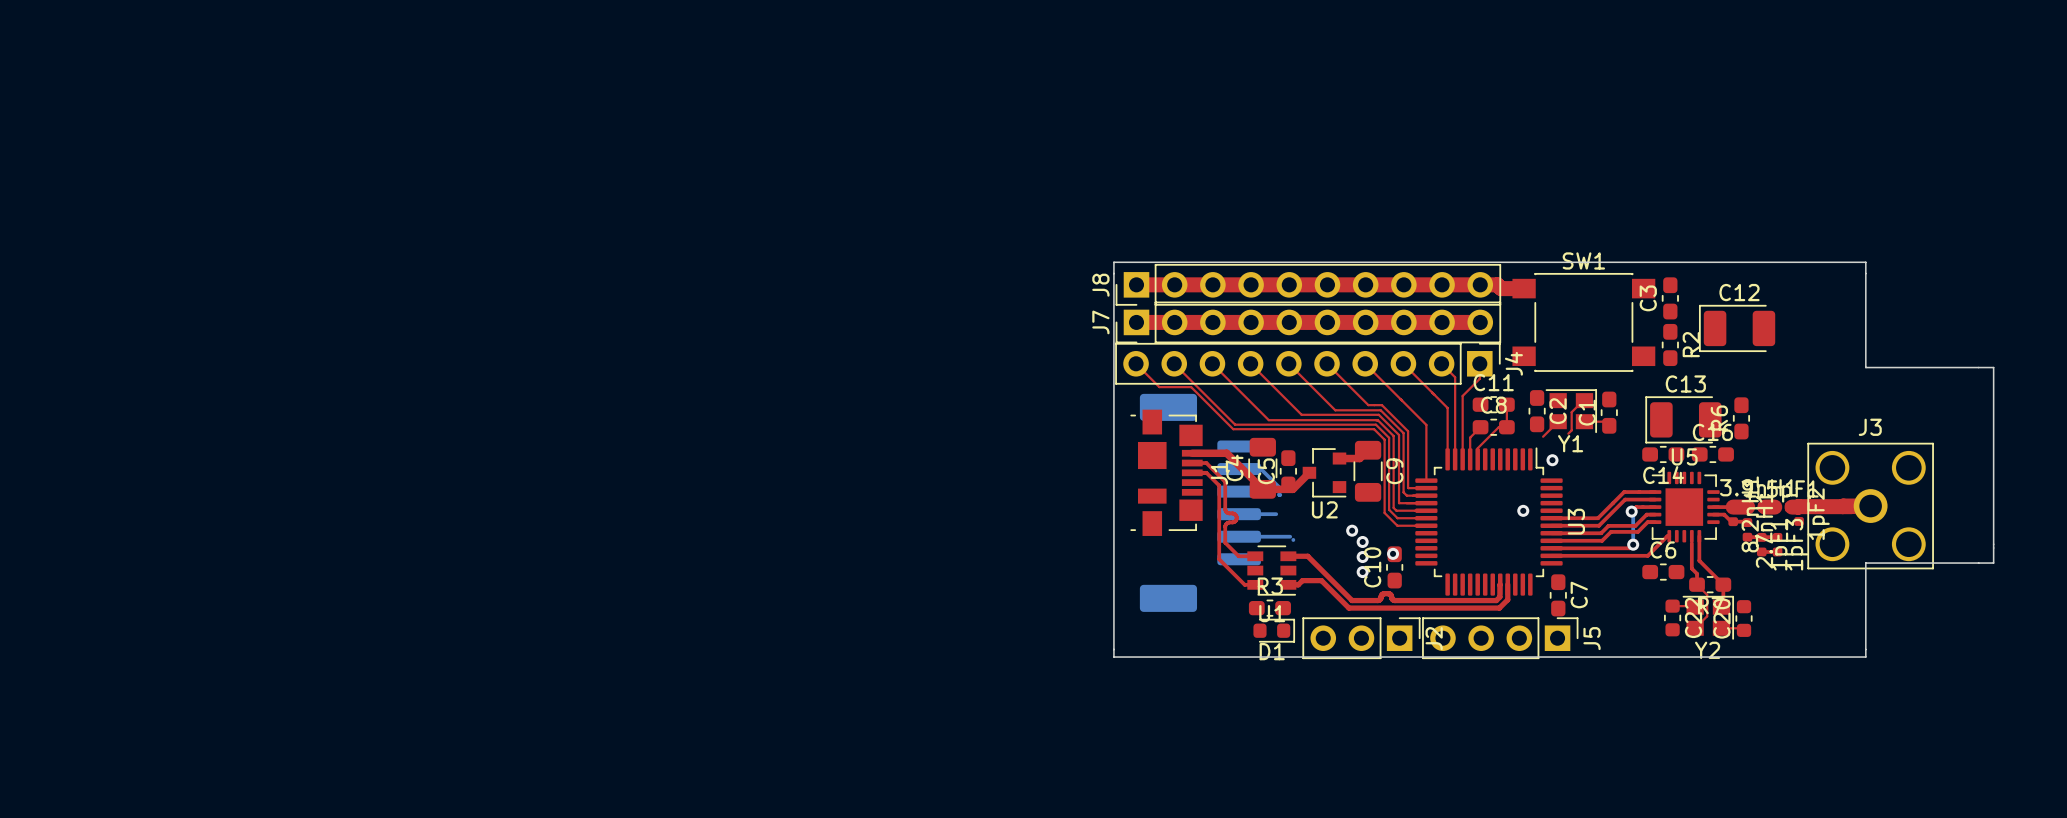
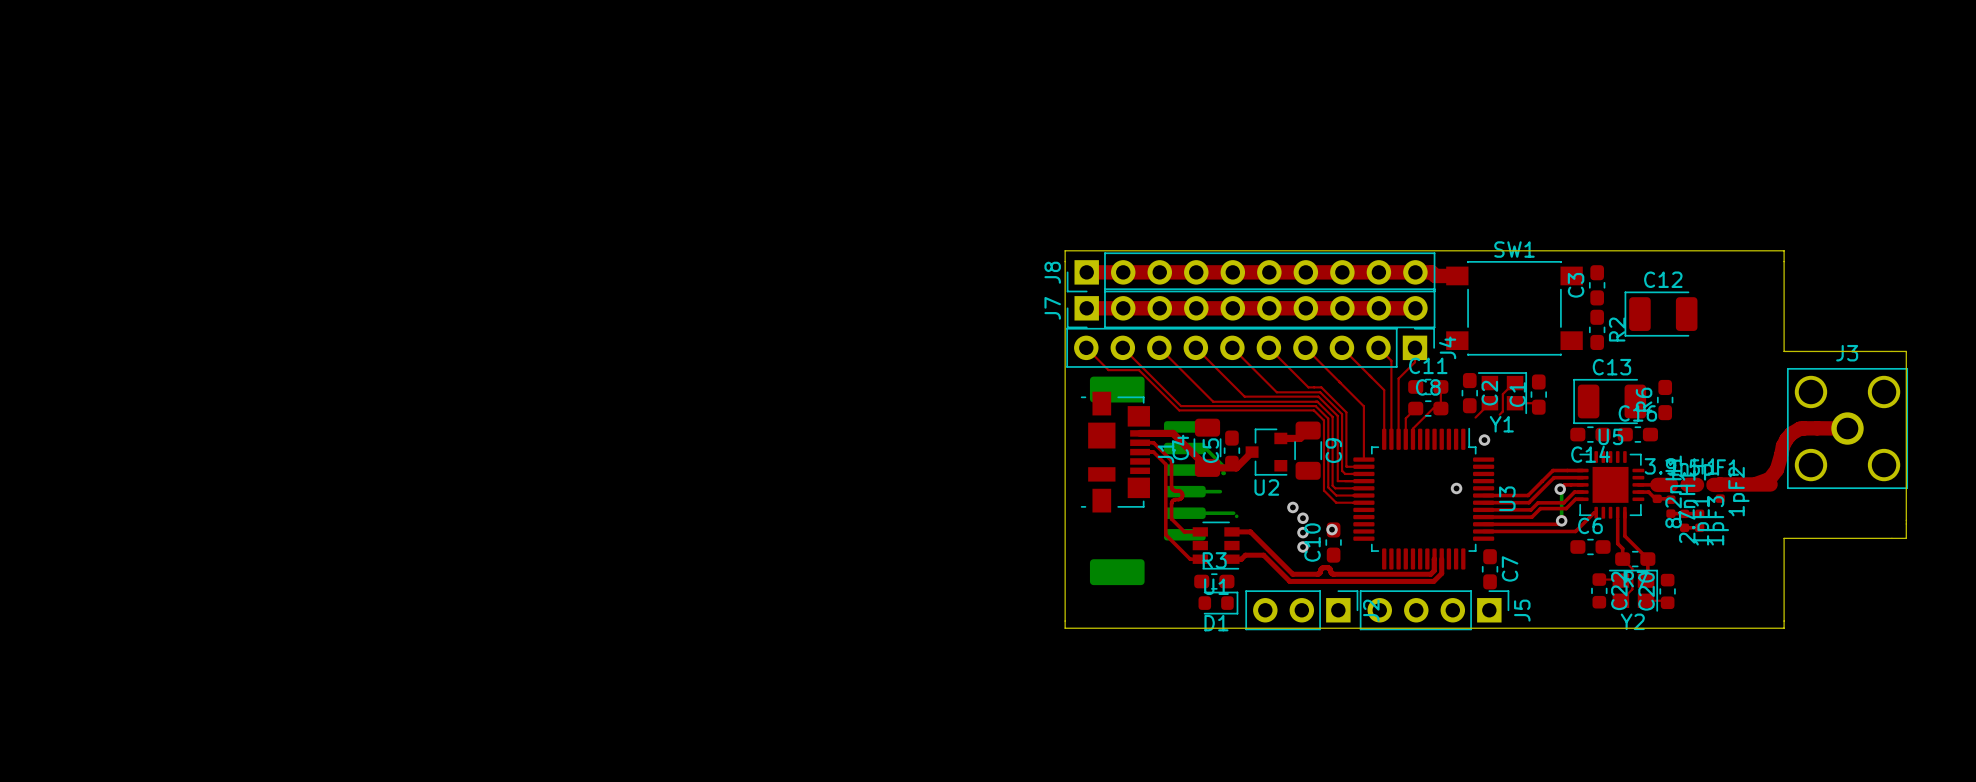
top track: none -> (1847, 428) (1799, 428) (1791, 433) (1783, 445) (1776, 469) (1769, 479) (1756, 483)
J3 position: (1870, 506) -> (1847, 428)

